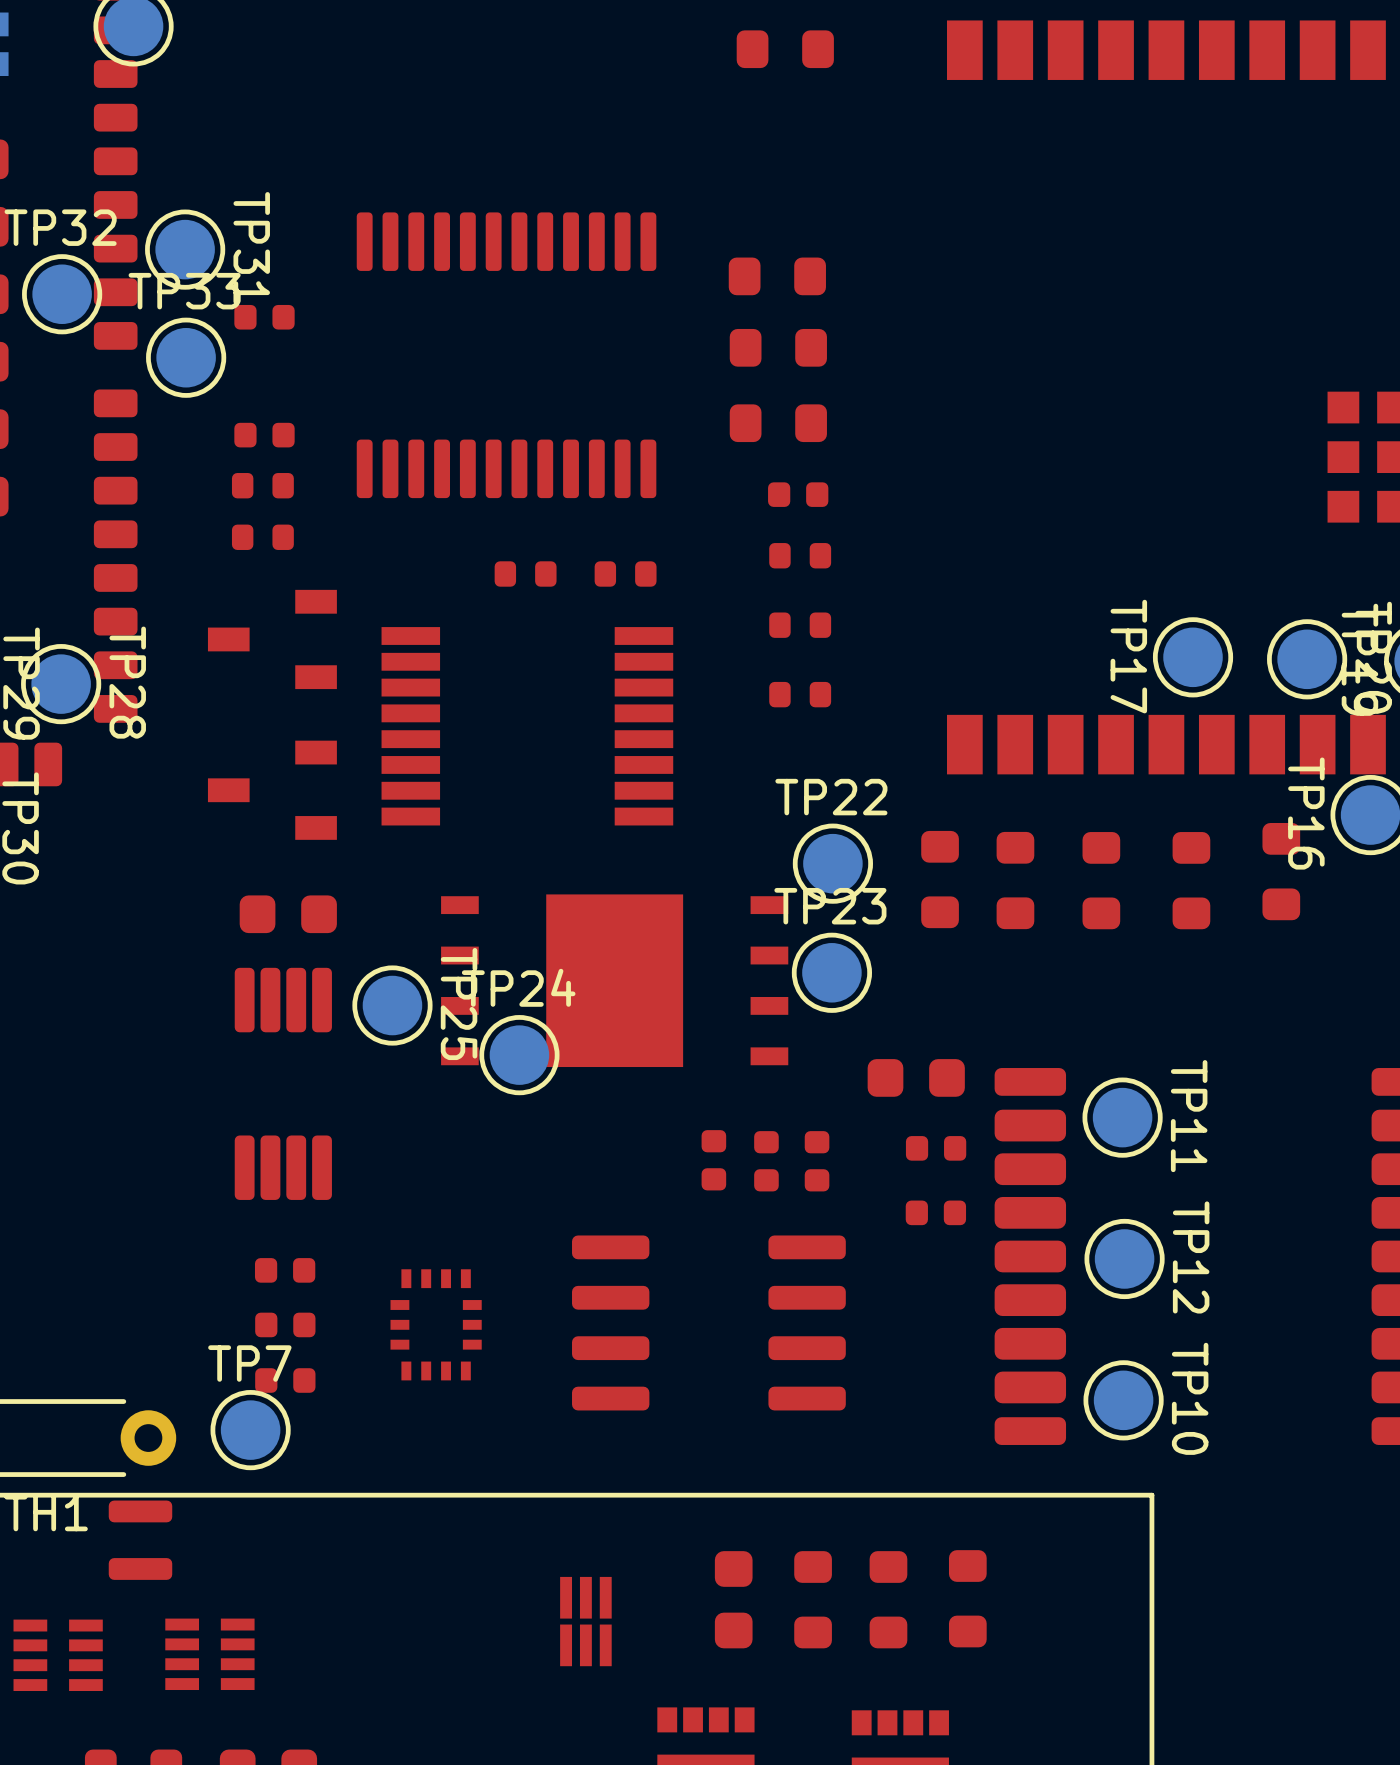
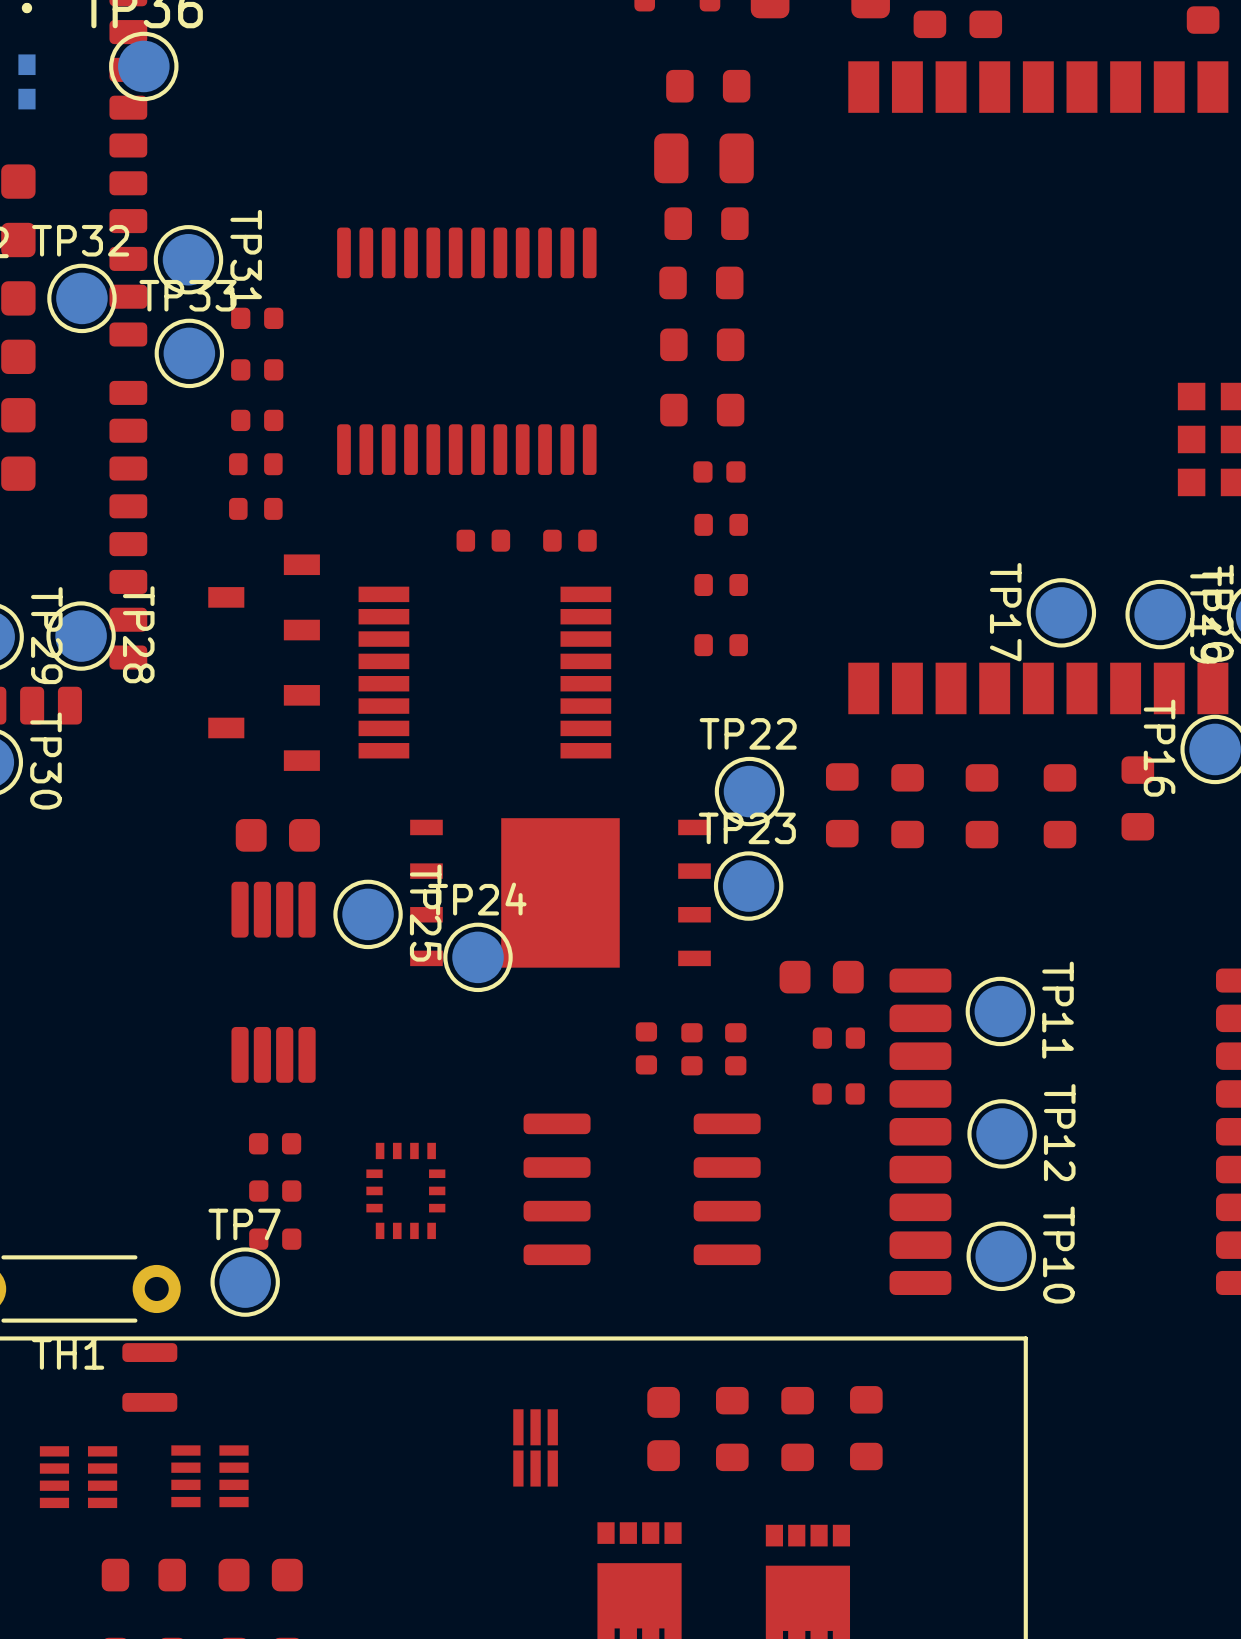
part: none -> (703, 158)
part: none -> (706, 223)
part: none -> (257, 369)

